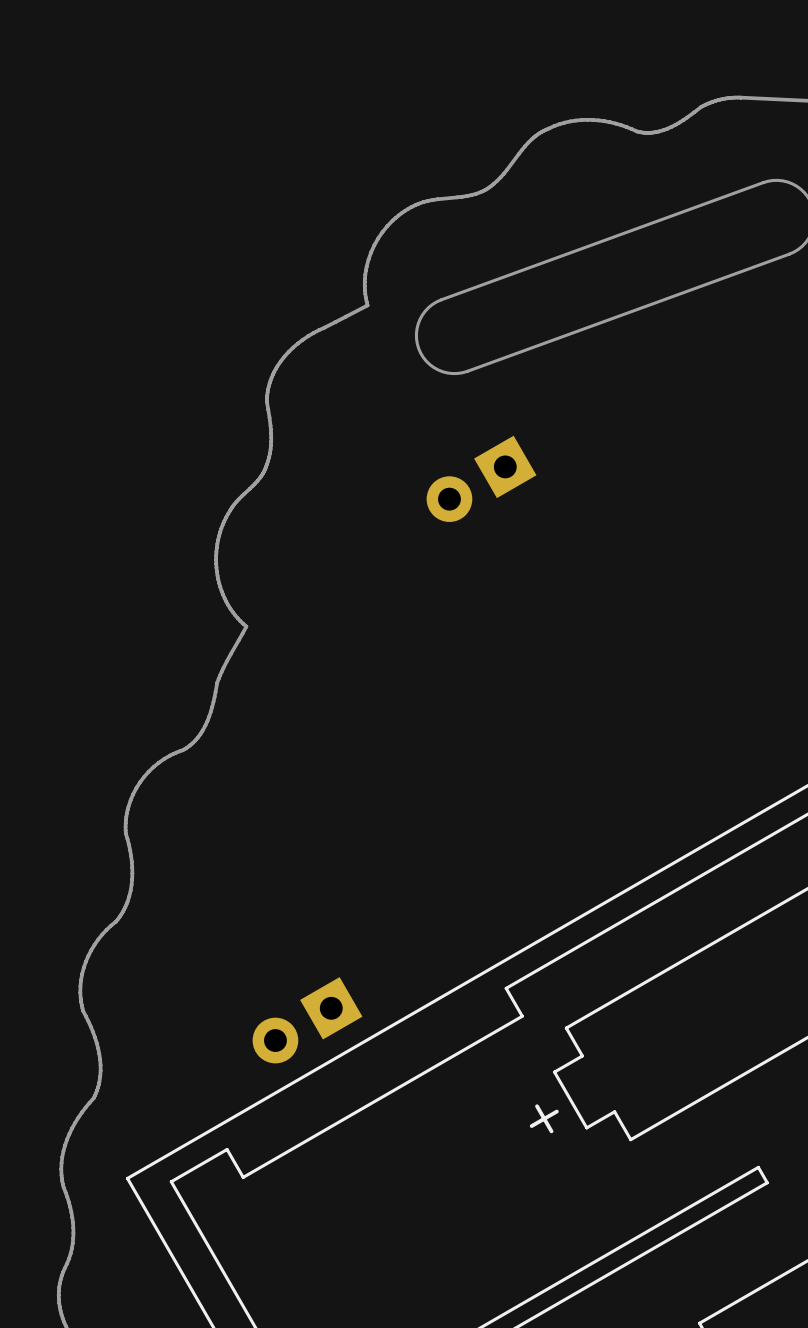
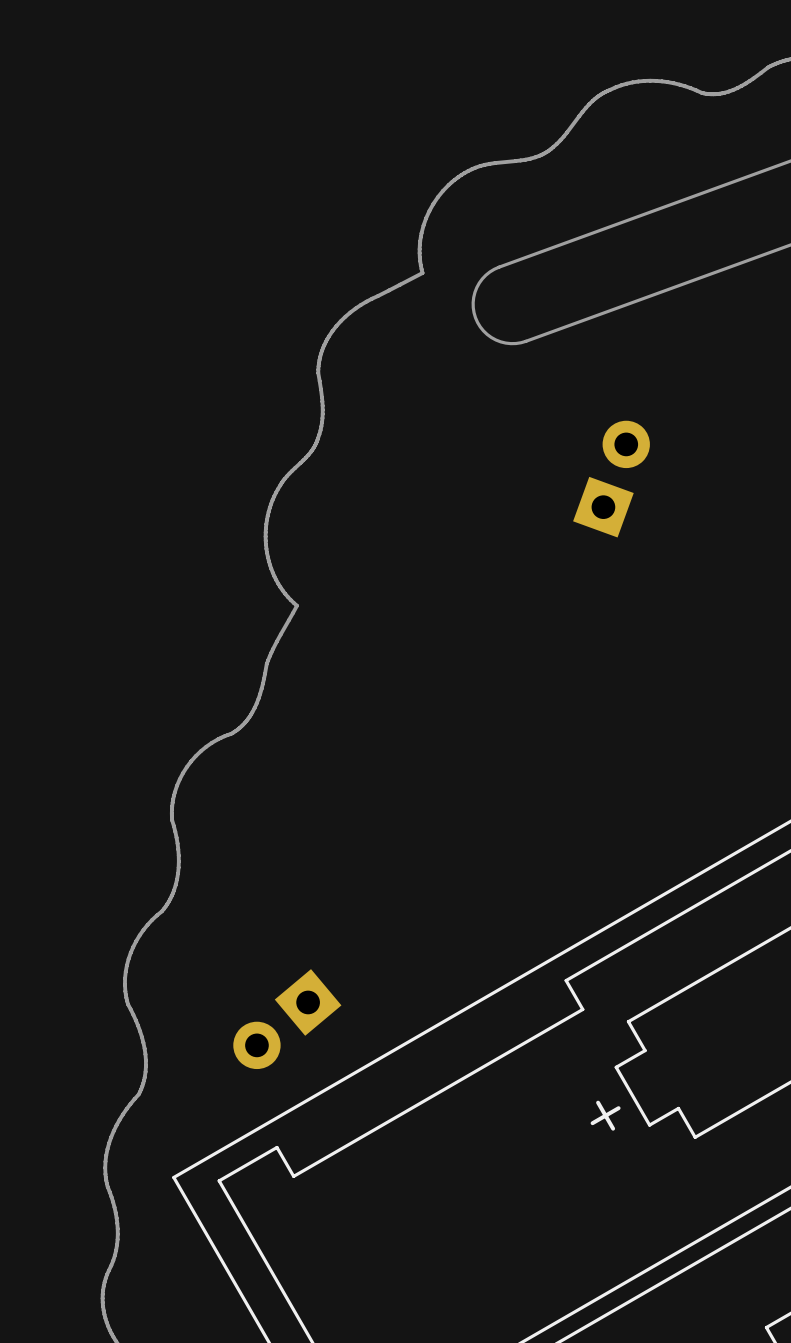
part: (481, 478) -> none
part: none -> (611, 479)
part: (307, 1020) -> none
part: none -> (287, 1019)

